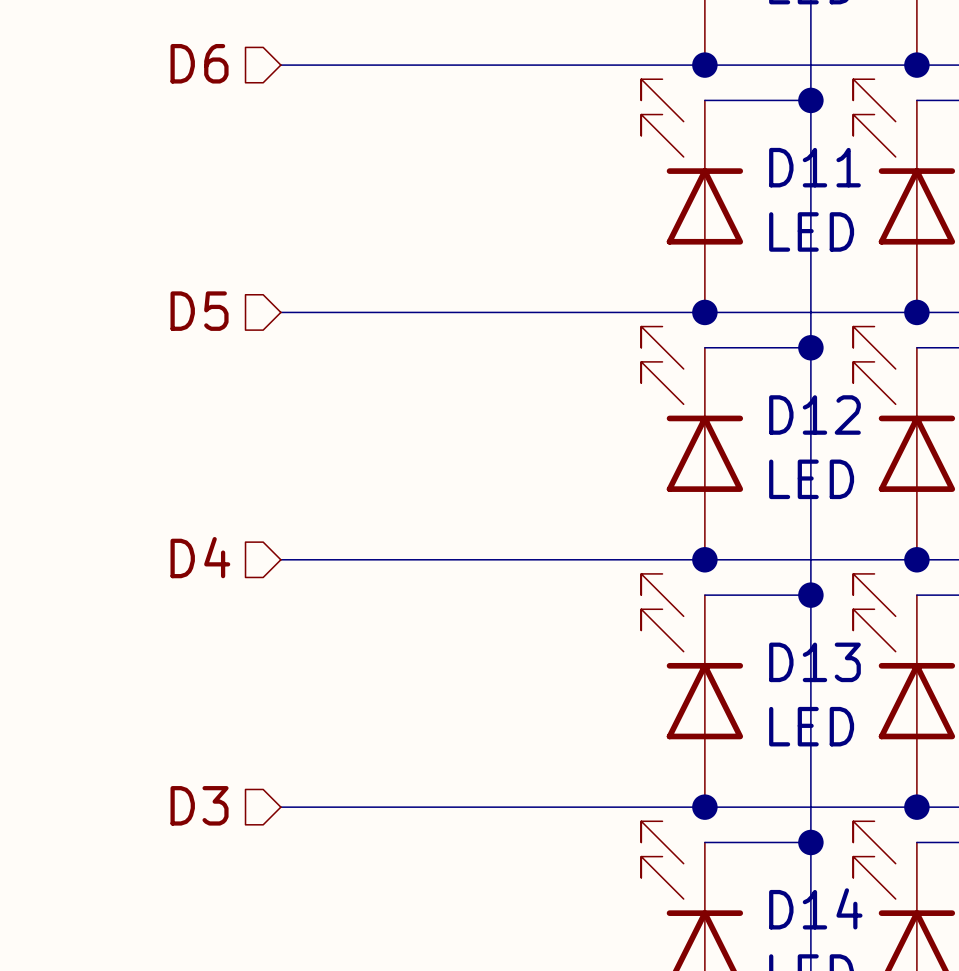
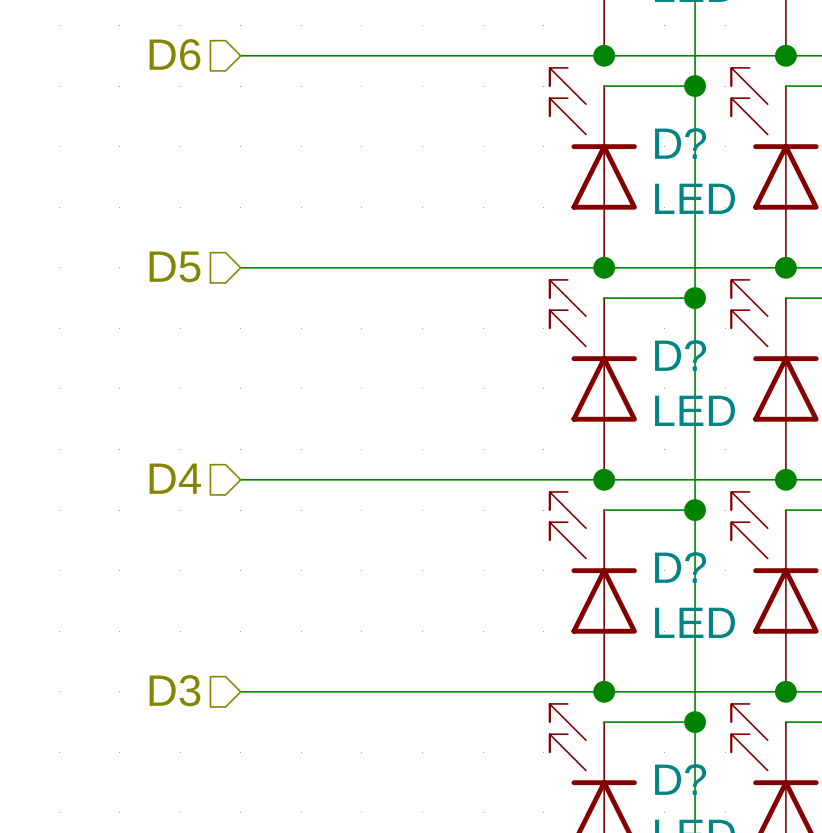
D11 name: D11 (814, 167) -> D? (680, 143)
D12 name: D12 (814, 415) -> D? (680, 355)
D13 name: D13 (814, 662) -> D? (680, 567)
D14 name: D14 (815, 908) -> D? (680, 779)

